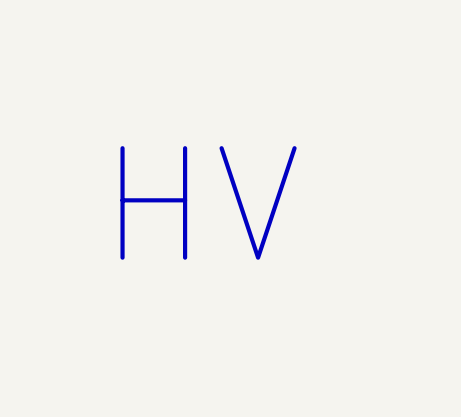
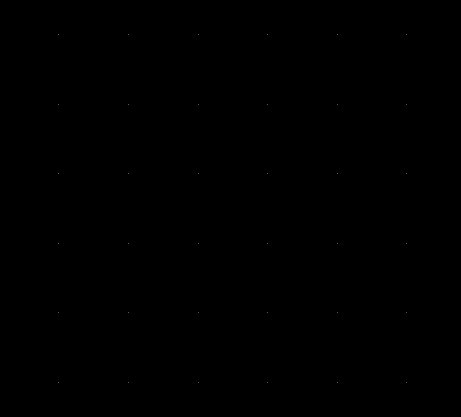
text: HV (208, 202) -> none

